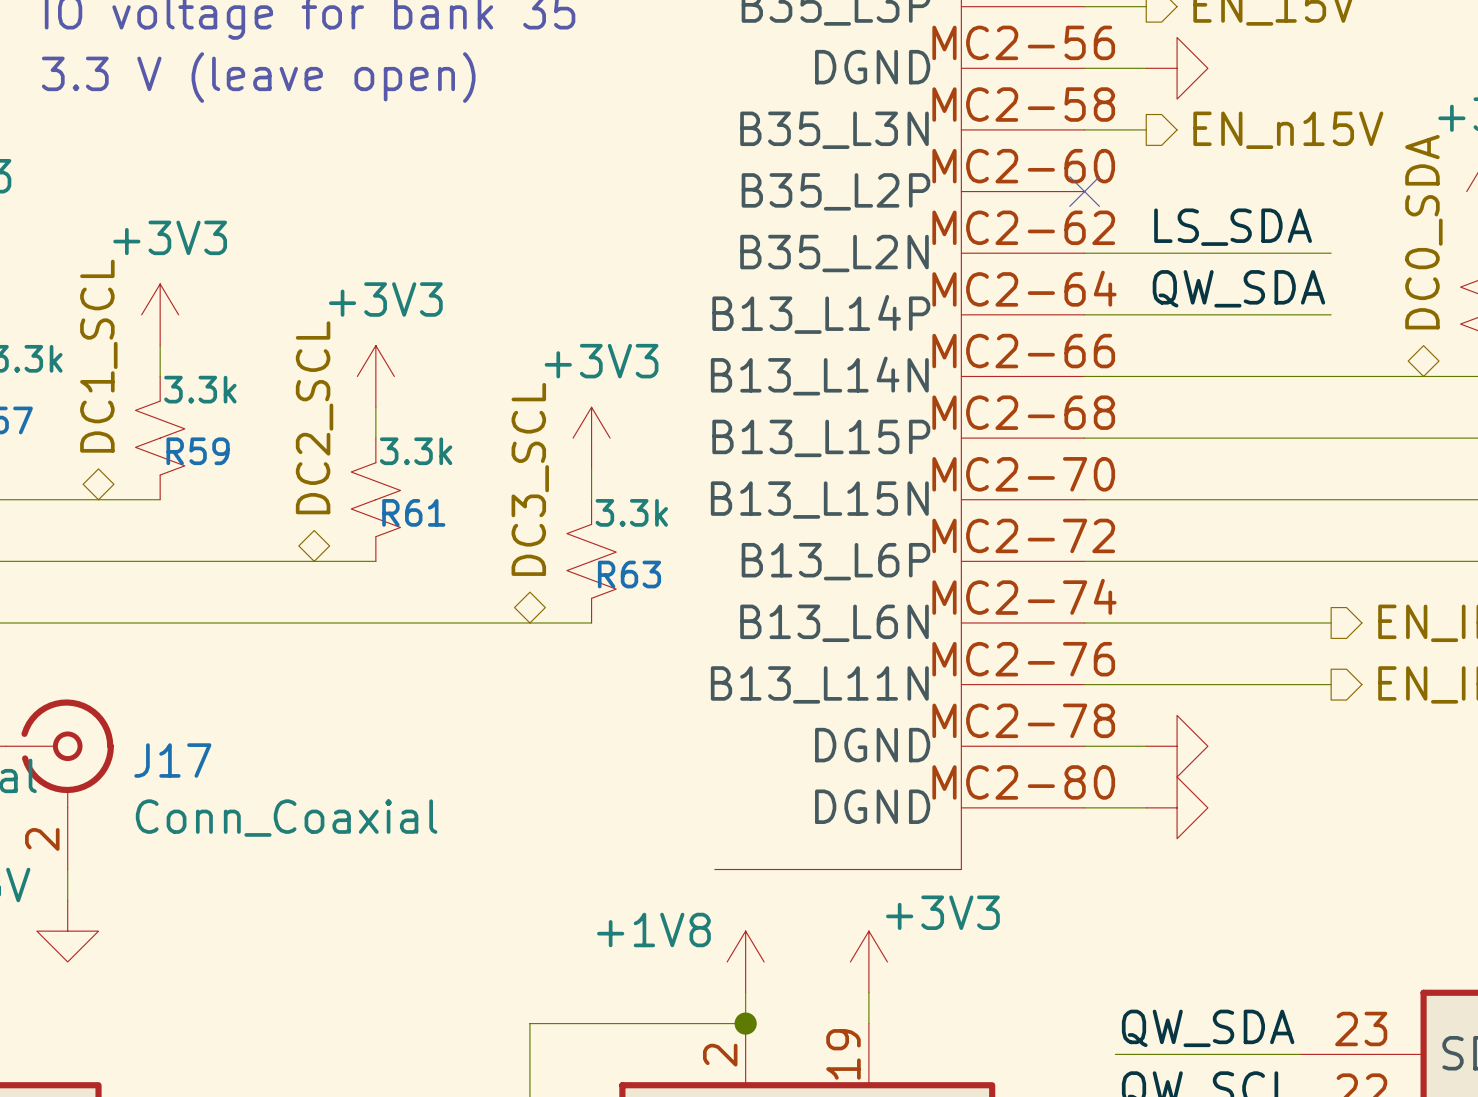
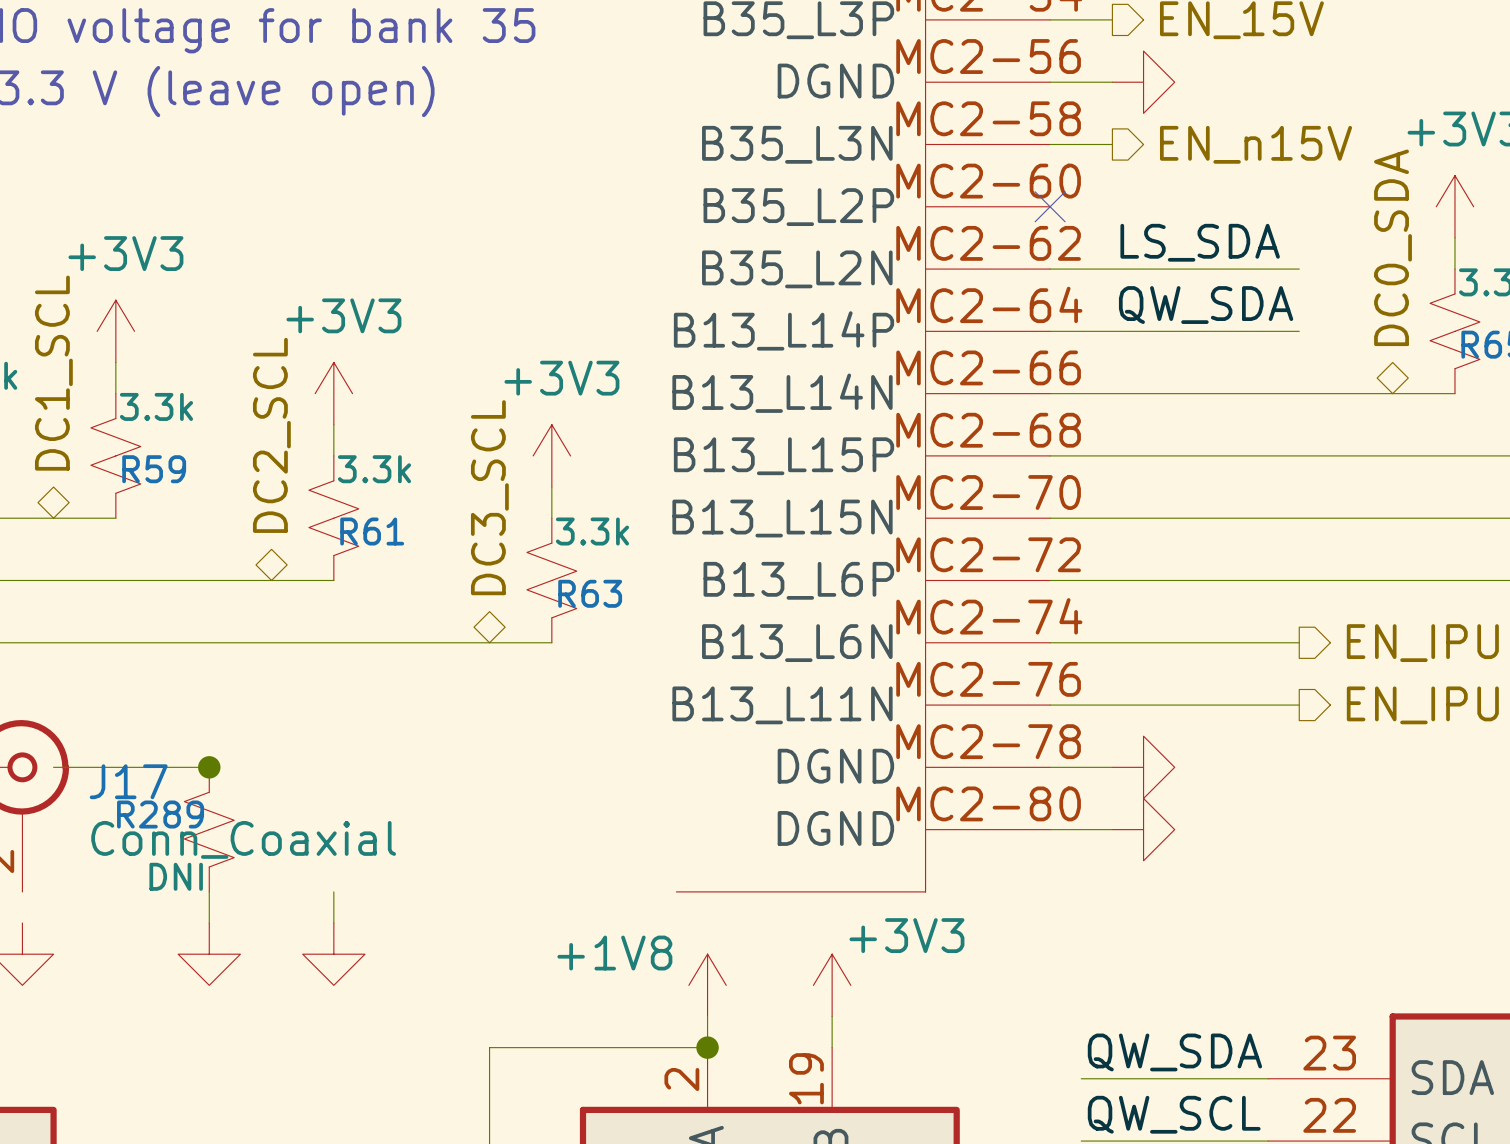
wire: none -> (53, 767) (209, 767)
junction: none -> (209, 767)
R289: none -> DNI (209, 829)
wire: (67, 869) (67, 900) -> (209, 891) (209, 923)
wire: none -> (333, 891) (333, 923)
power symbol: none -> (209, 954)
power symbol: none -> (333, 954)

